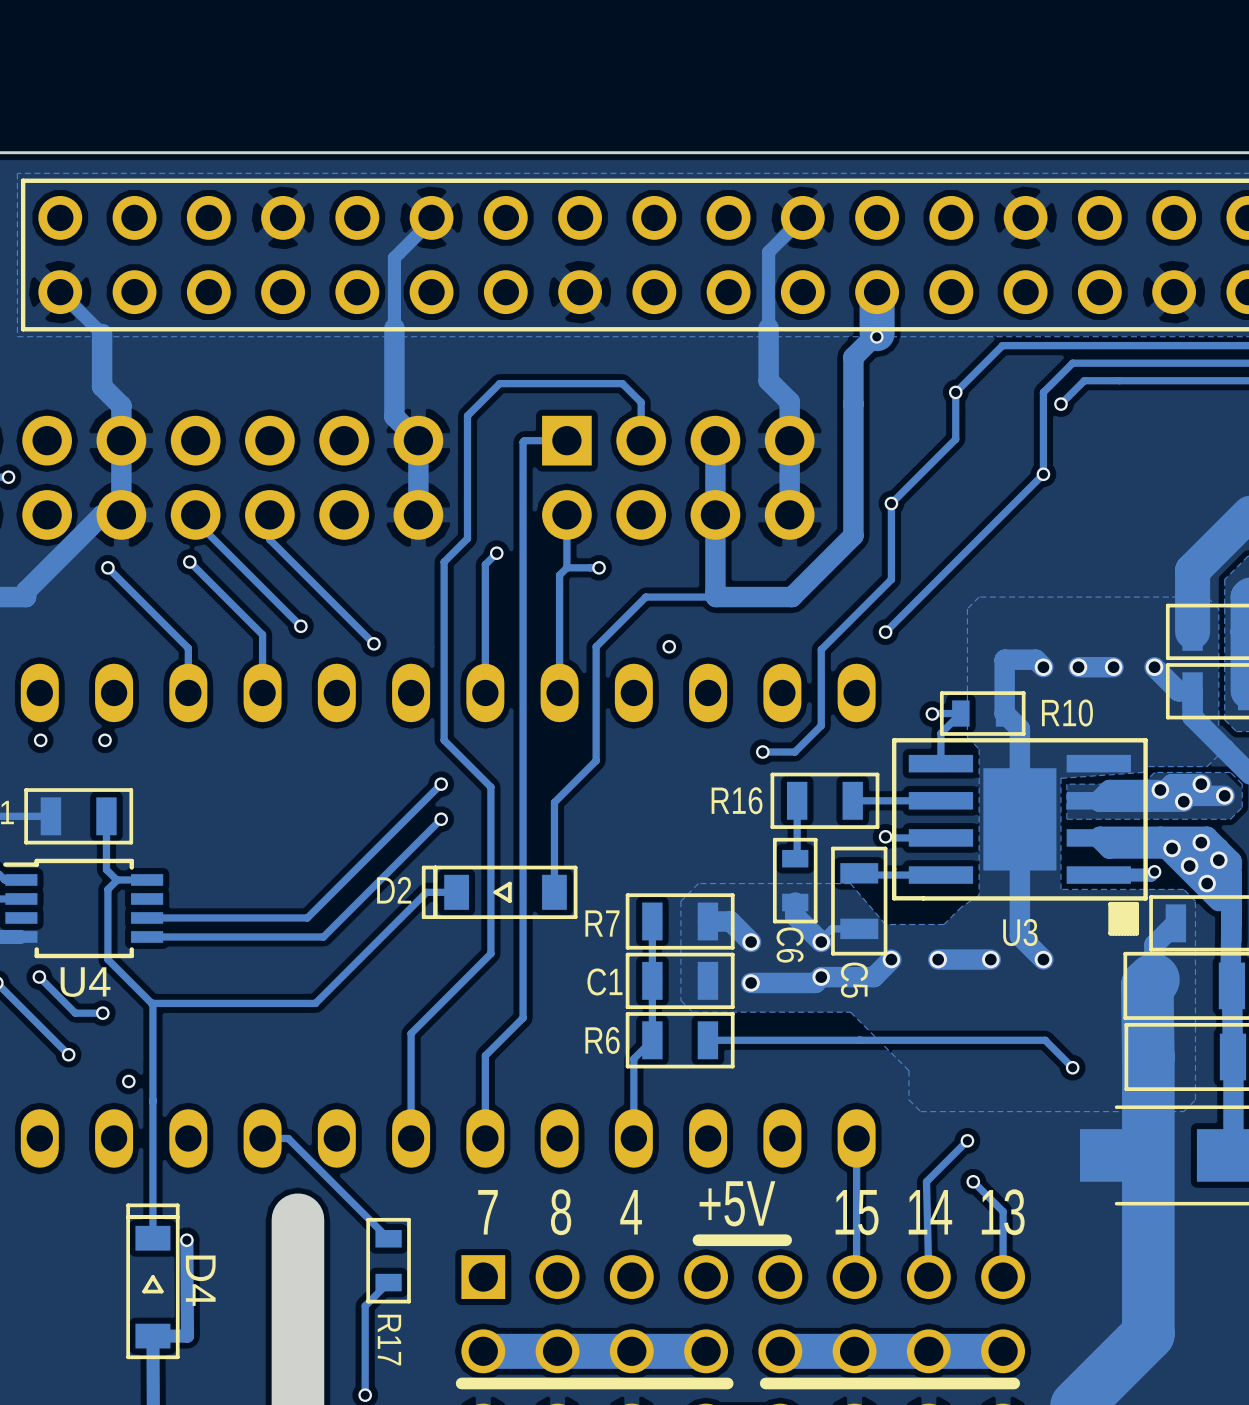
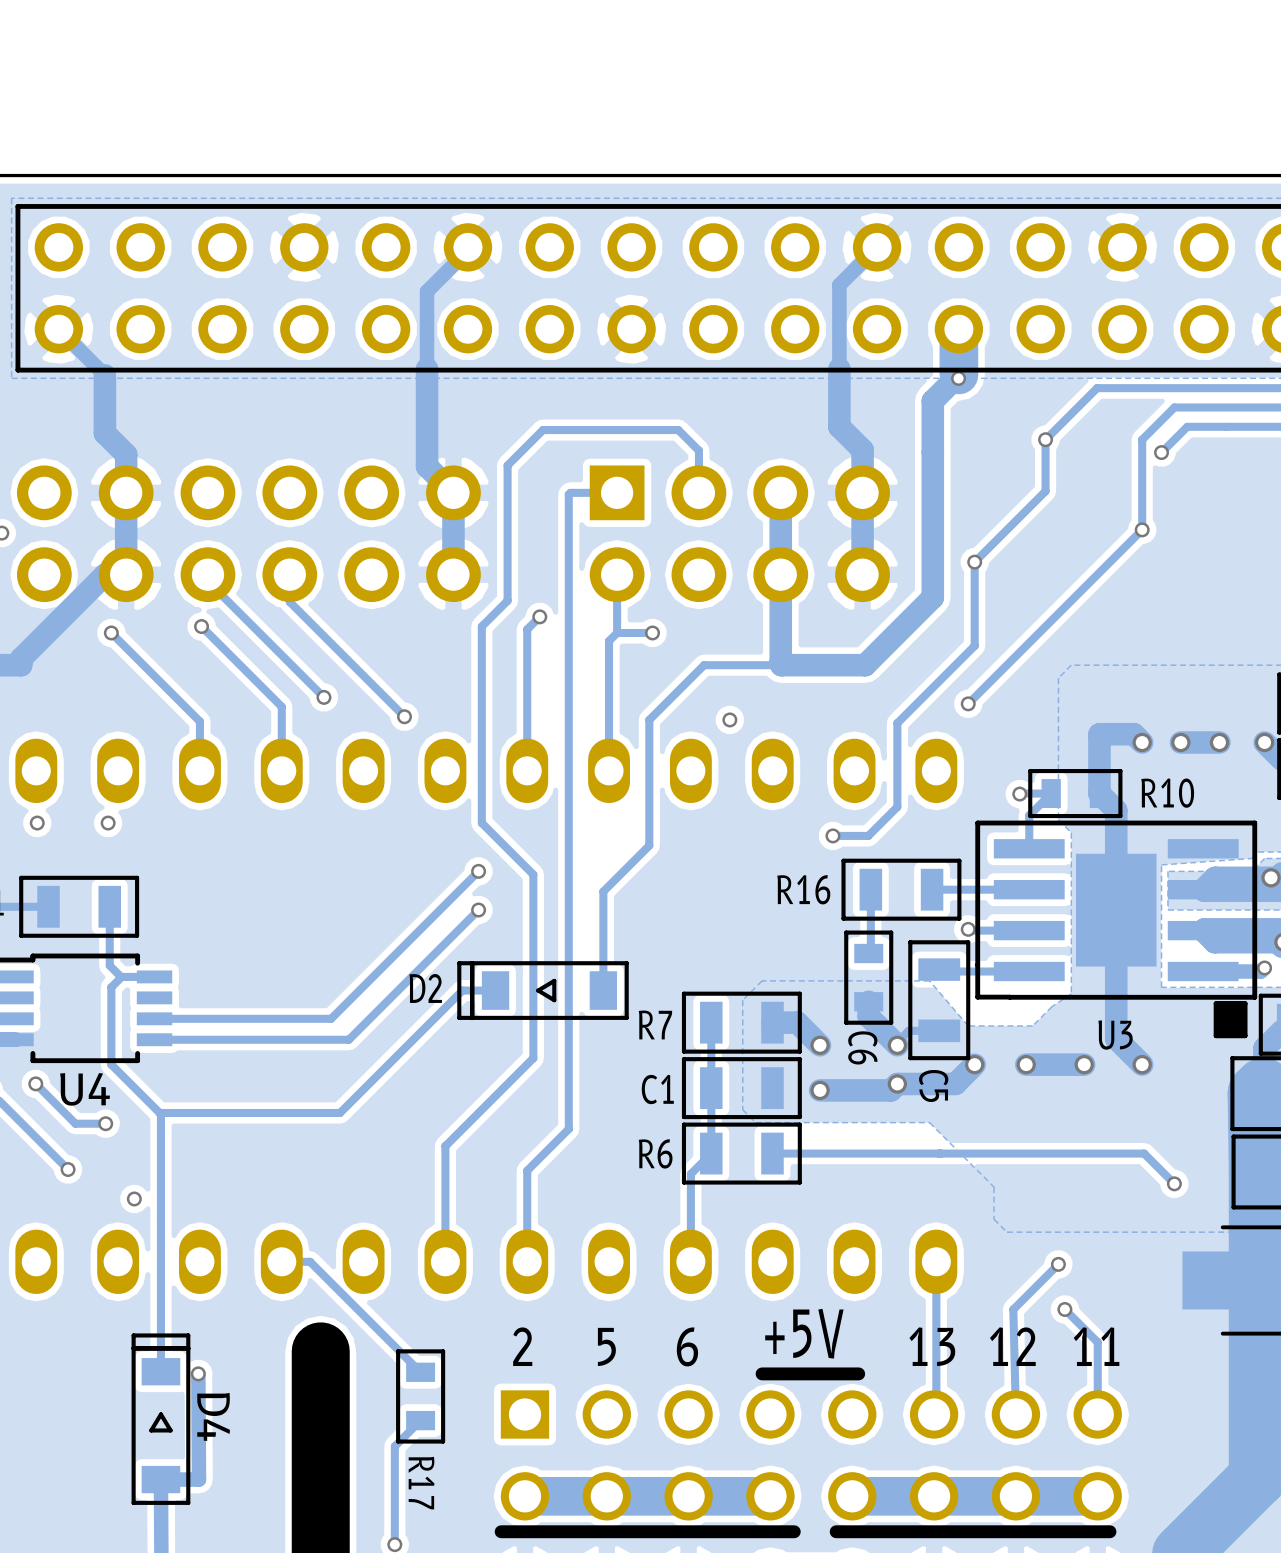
text: 7 (488, 1212) -> 2 (522, 1346)
text: 8 (561, 1212) -> 5 (606, 1346)
text: 4 (631, 1212) -> 6 (687, 1346)
text: 15 (857, 1212) -> 13 (932, 1346)
text: 14 (930, 1212) -> 12 (1012, 1346)
text: 13 (1003, 1212) -> 11 (1096, 1346)

